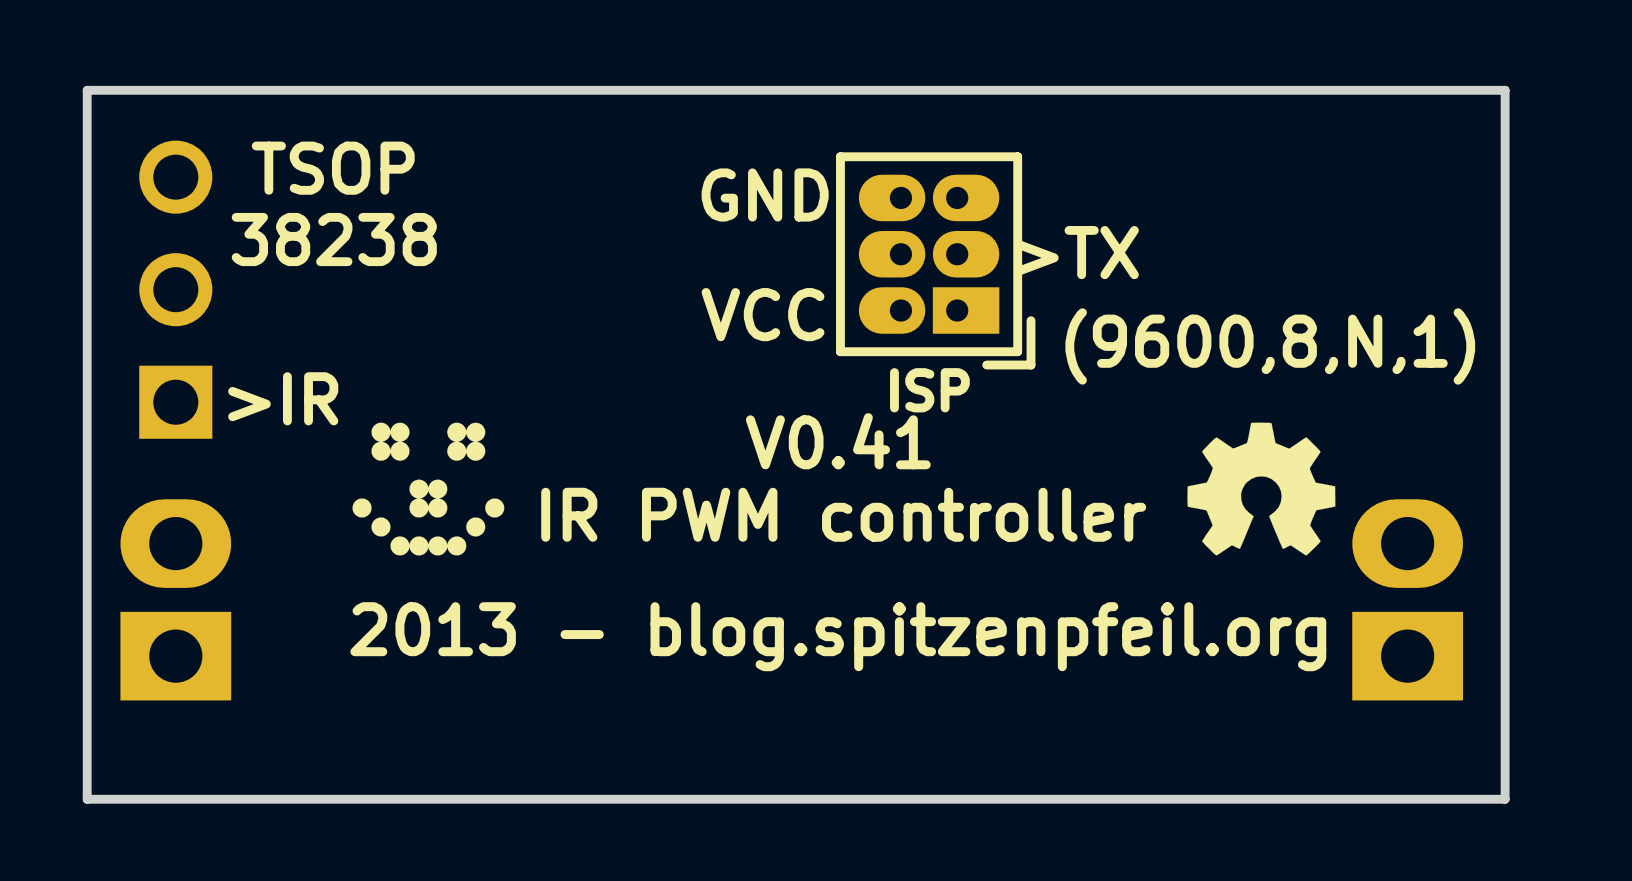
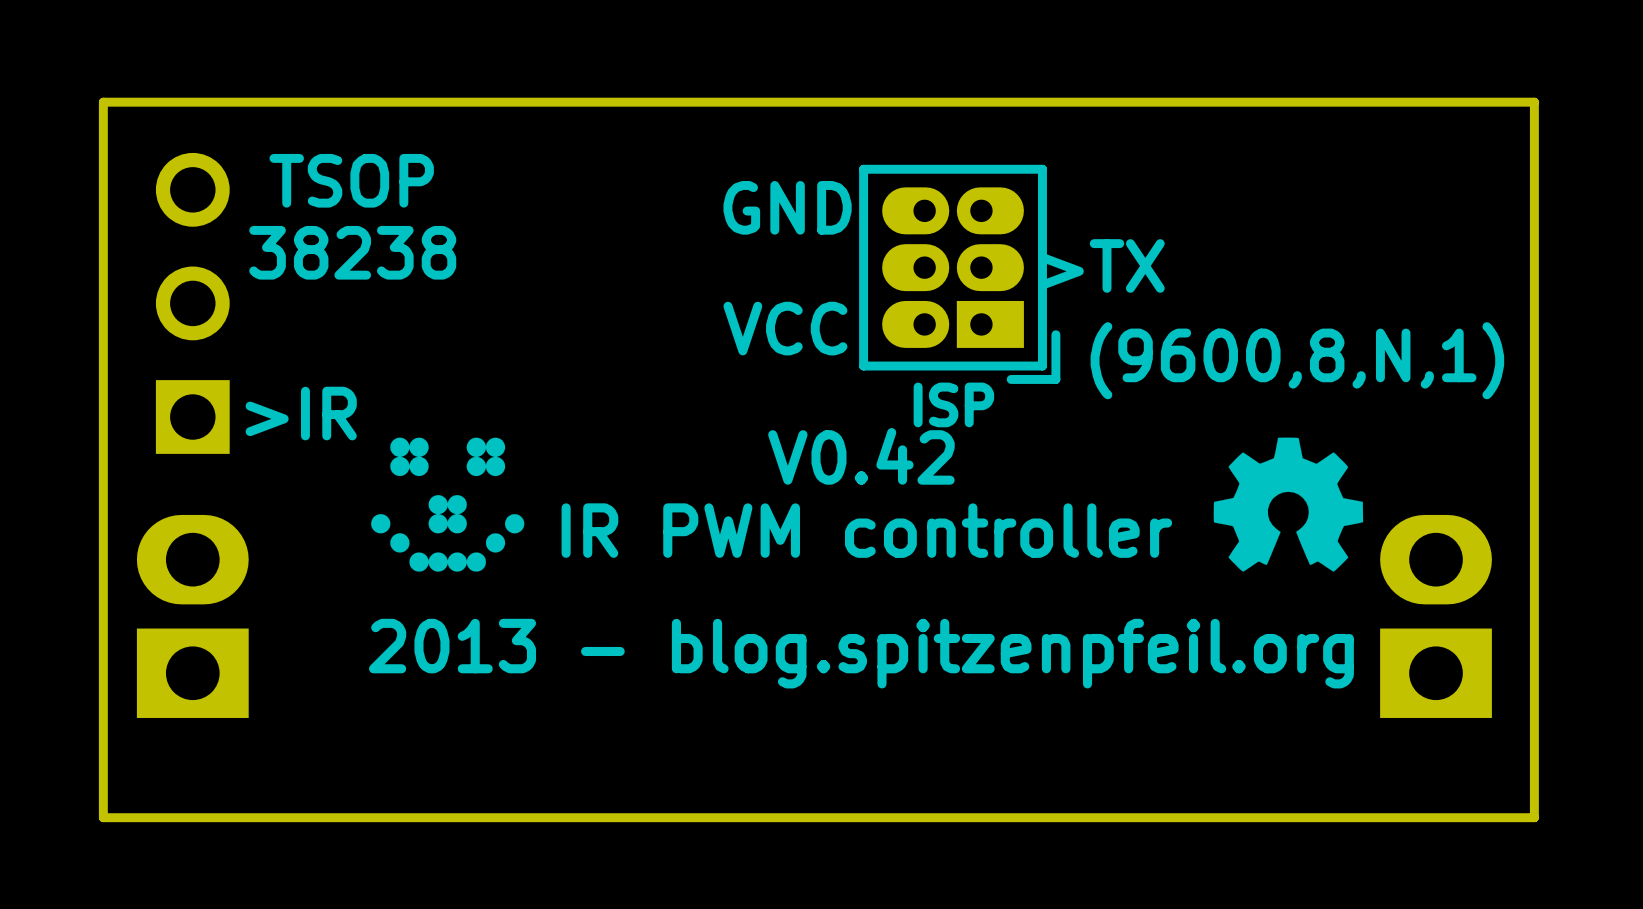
text: V0.41 (838, 441) -> V0.42 (861, 456)

